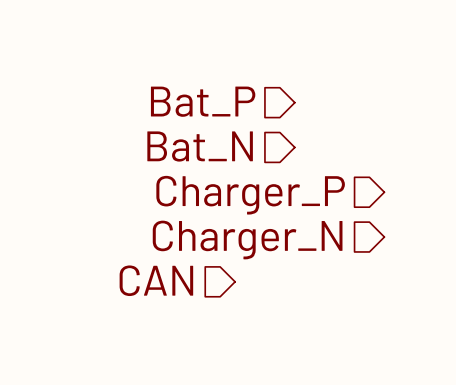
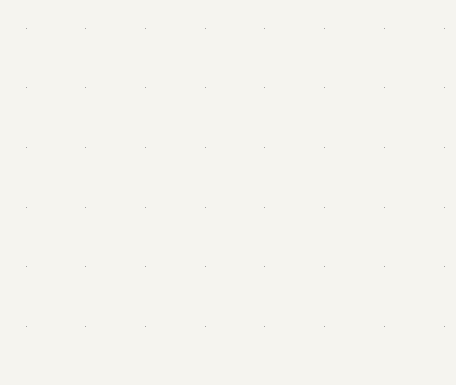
hierarchical label: Bat_P (203, 101) -> none
hierarchical label: Bat_N (200, 146) -> none
hierarchical label: Charger_P (250, 195) -> none
hierarchical label: Charger_N (247, 240) -> none
hierarchical label: CAN (156, 280) -> none

